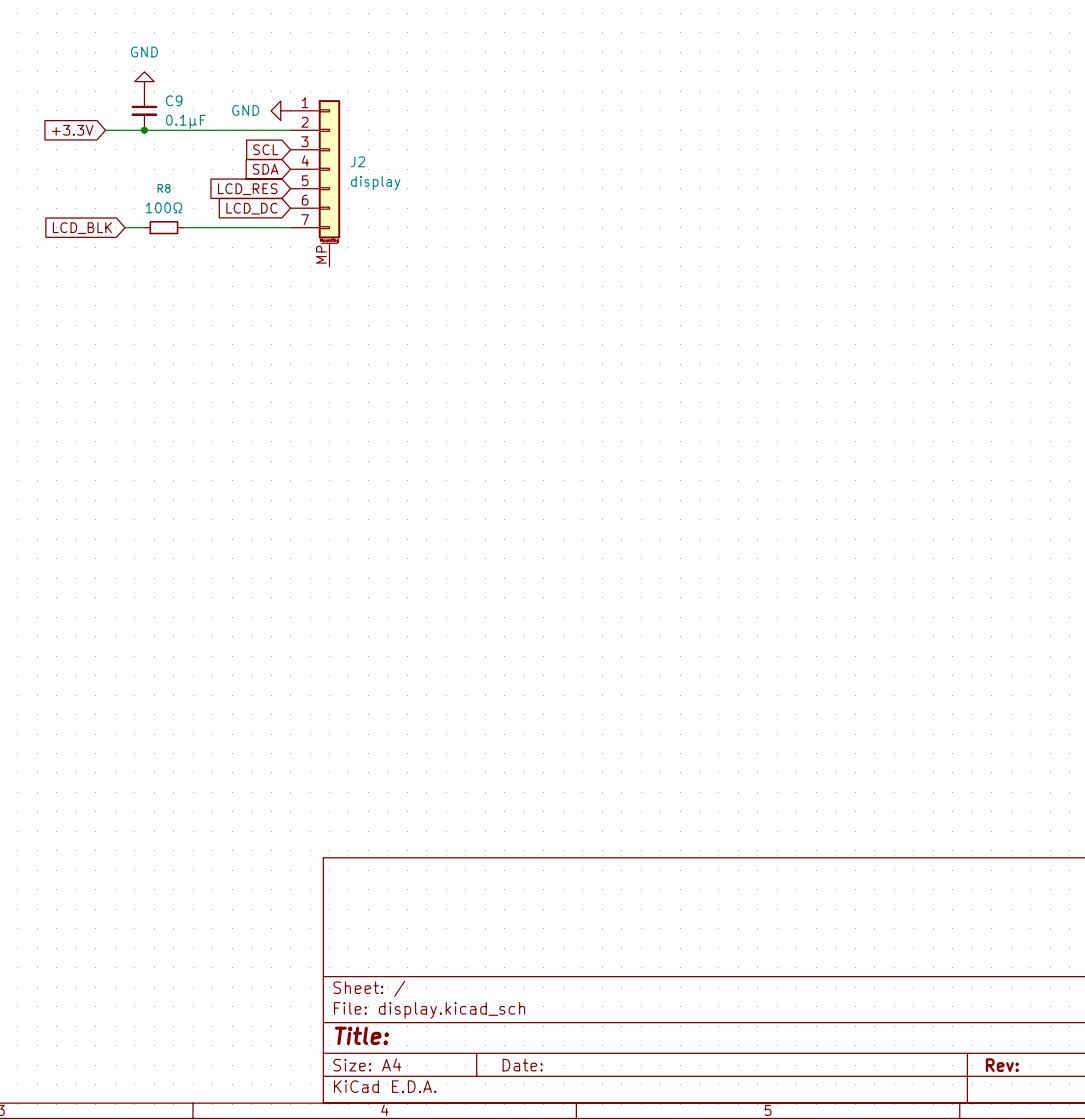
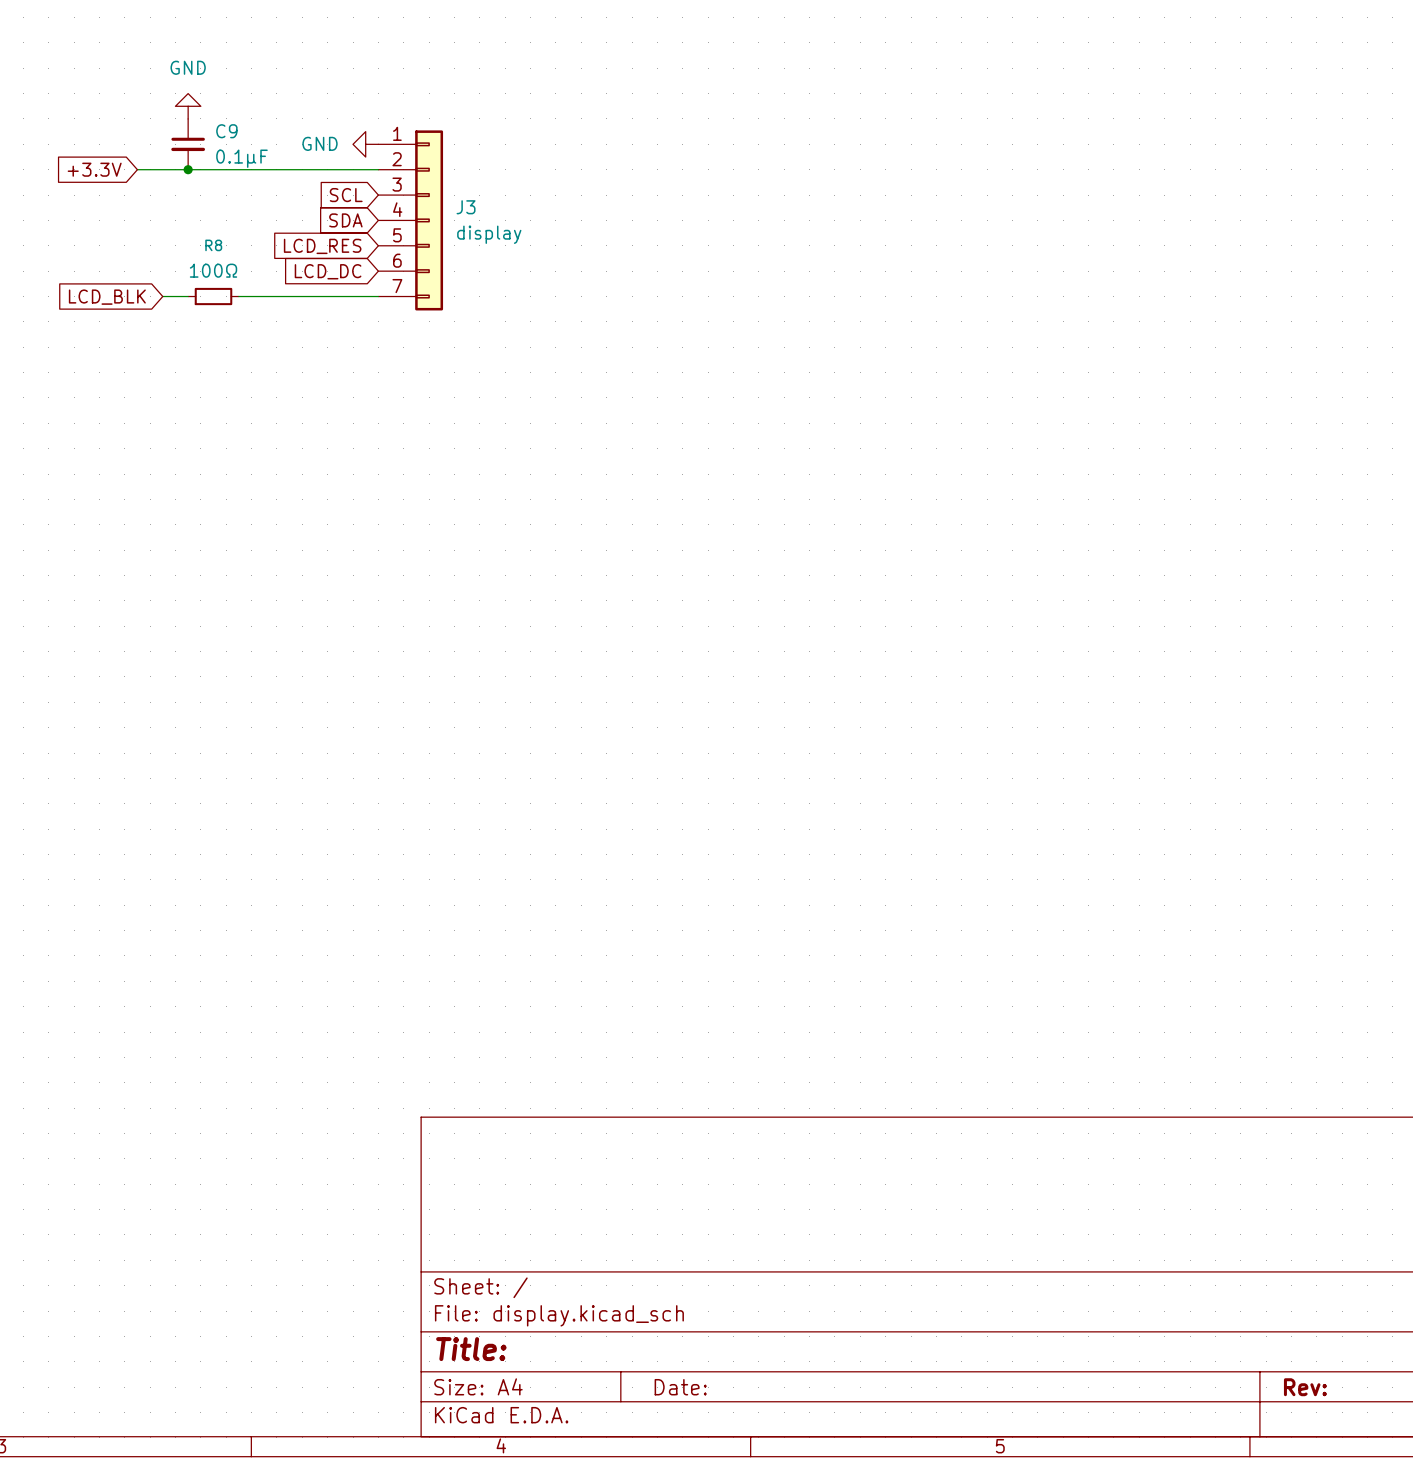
J3: none -> display (410, 220)
J2: display (315, 183) -> none

